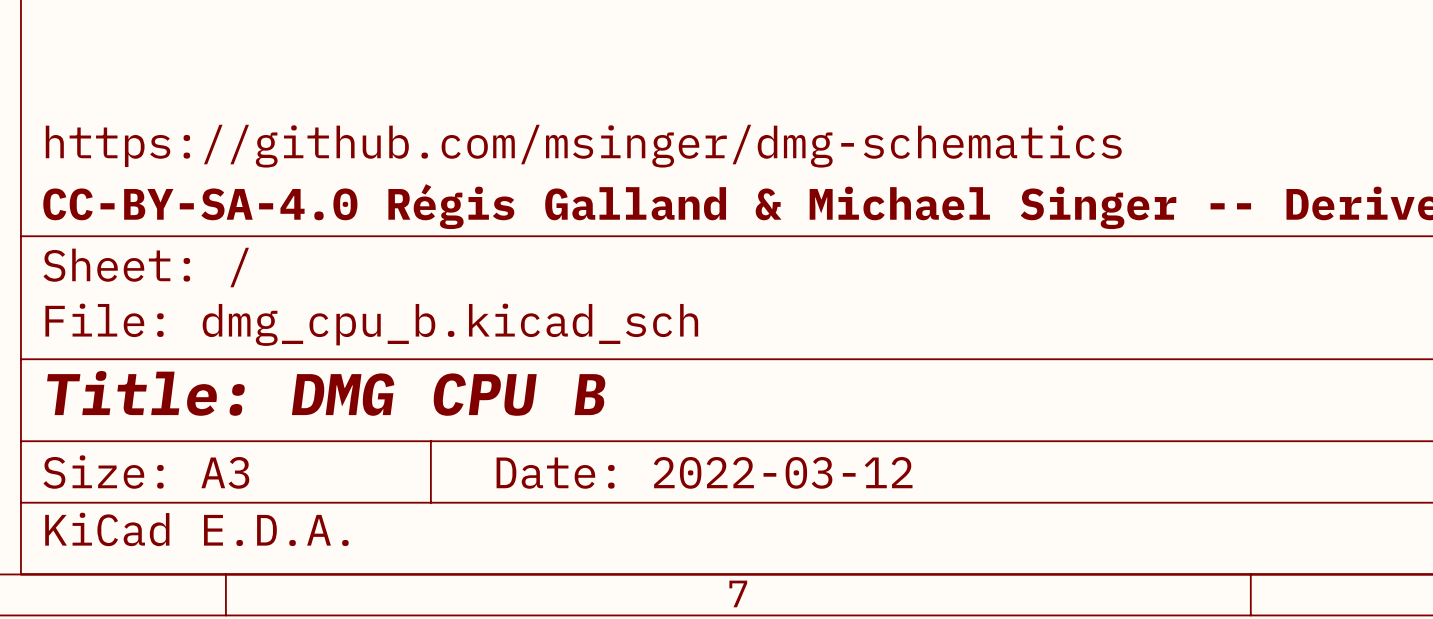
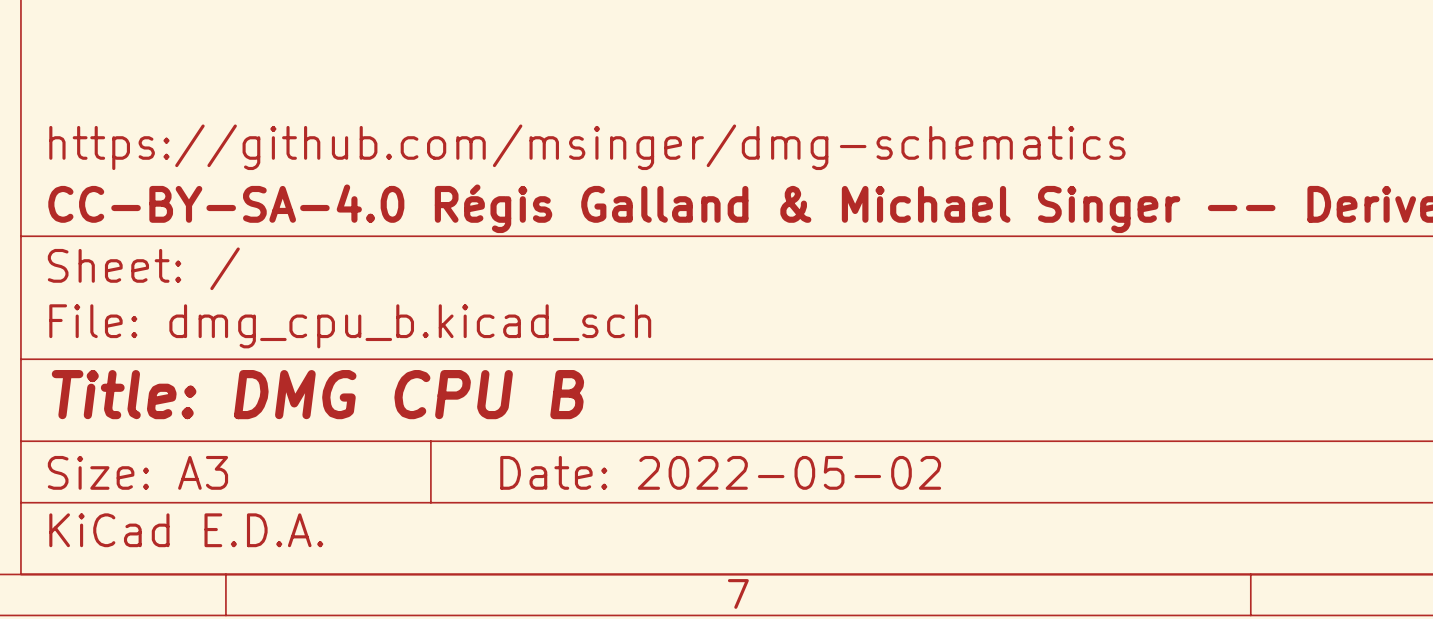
title block: Date: 2022-03-12 (704, 472) -> Date: 2022-05-02 (720, 472)

